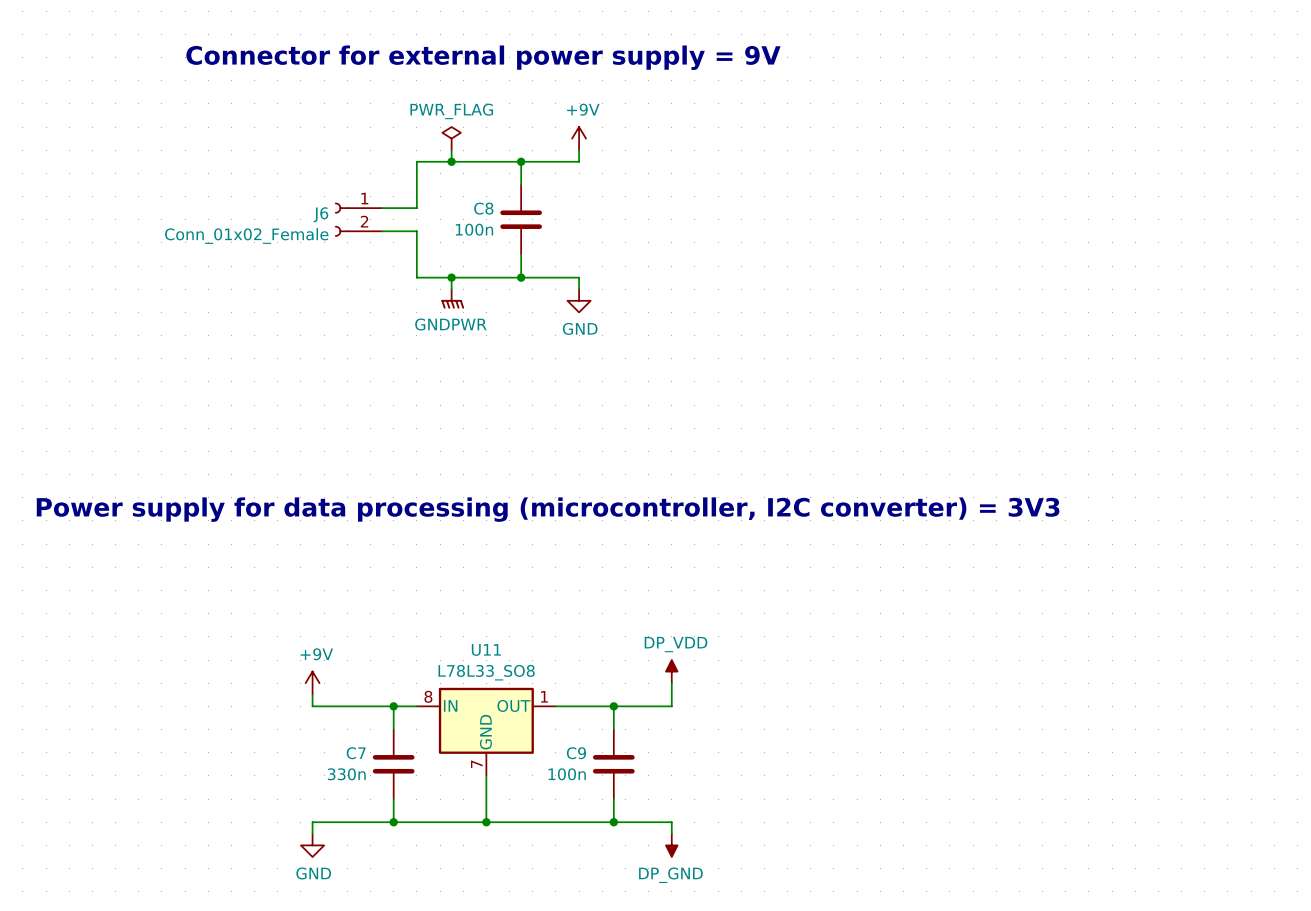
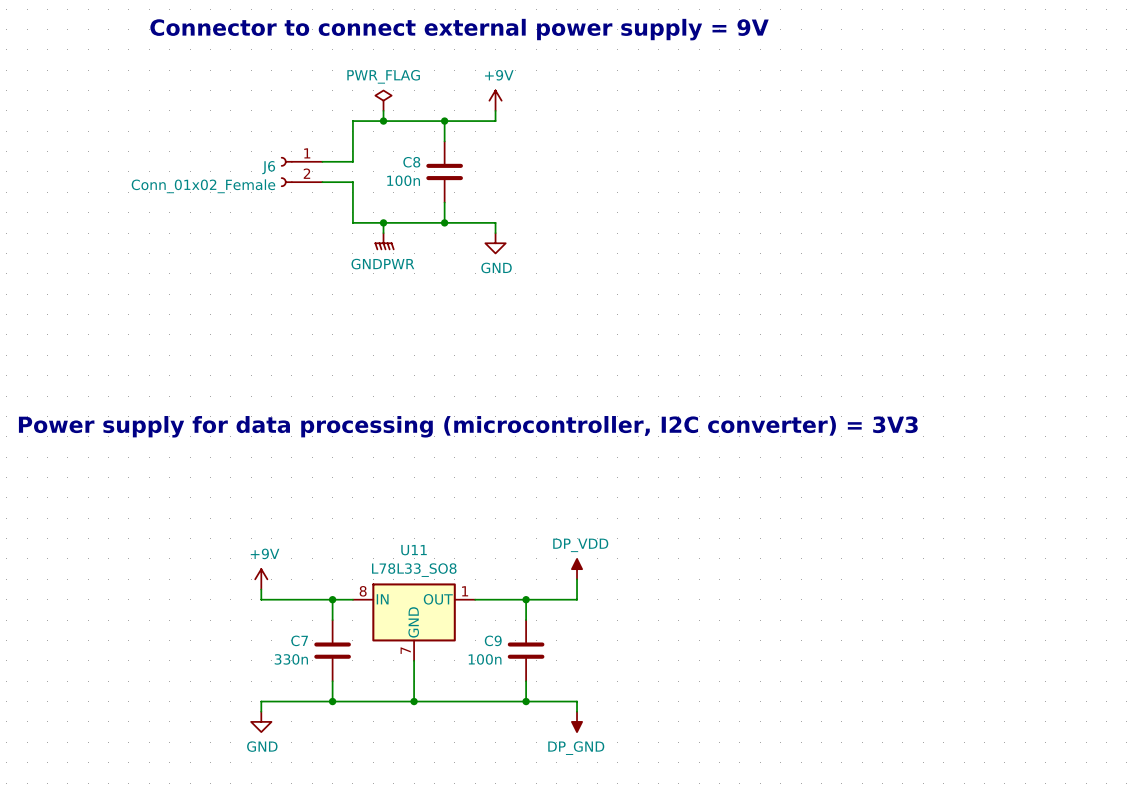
text: Connector for external power supply = 9V (483, 57) -> Connector to connect external power supply = 9V (459, 29)

